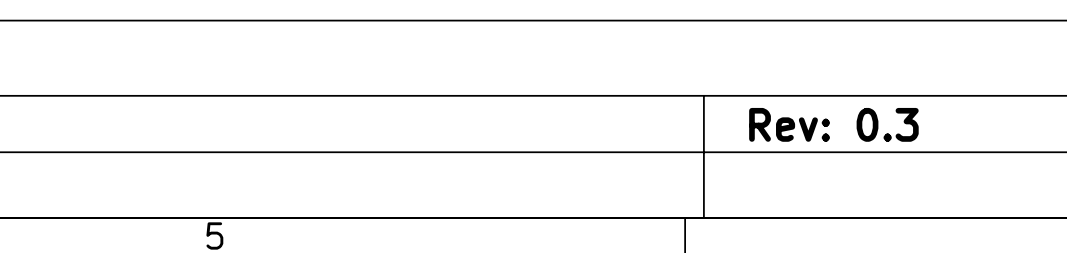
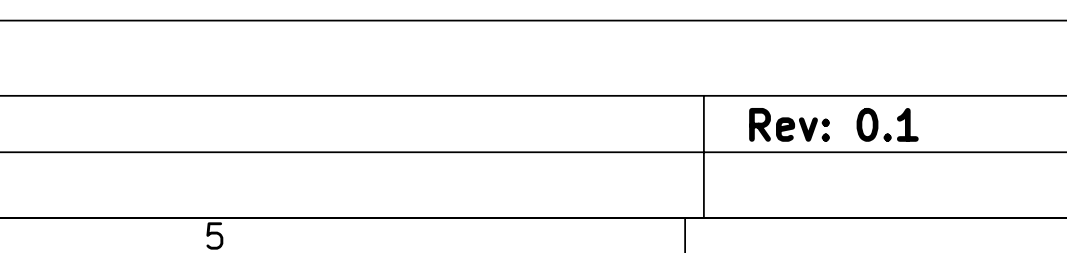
title block: Rev: 0.3 (833, 124) -> Rev: 0.1 (833, 124)

